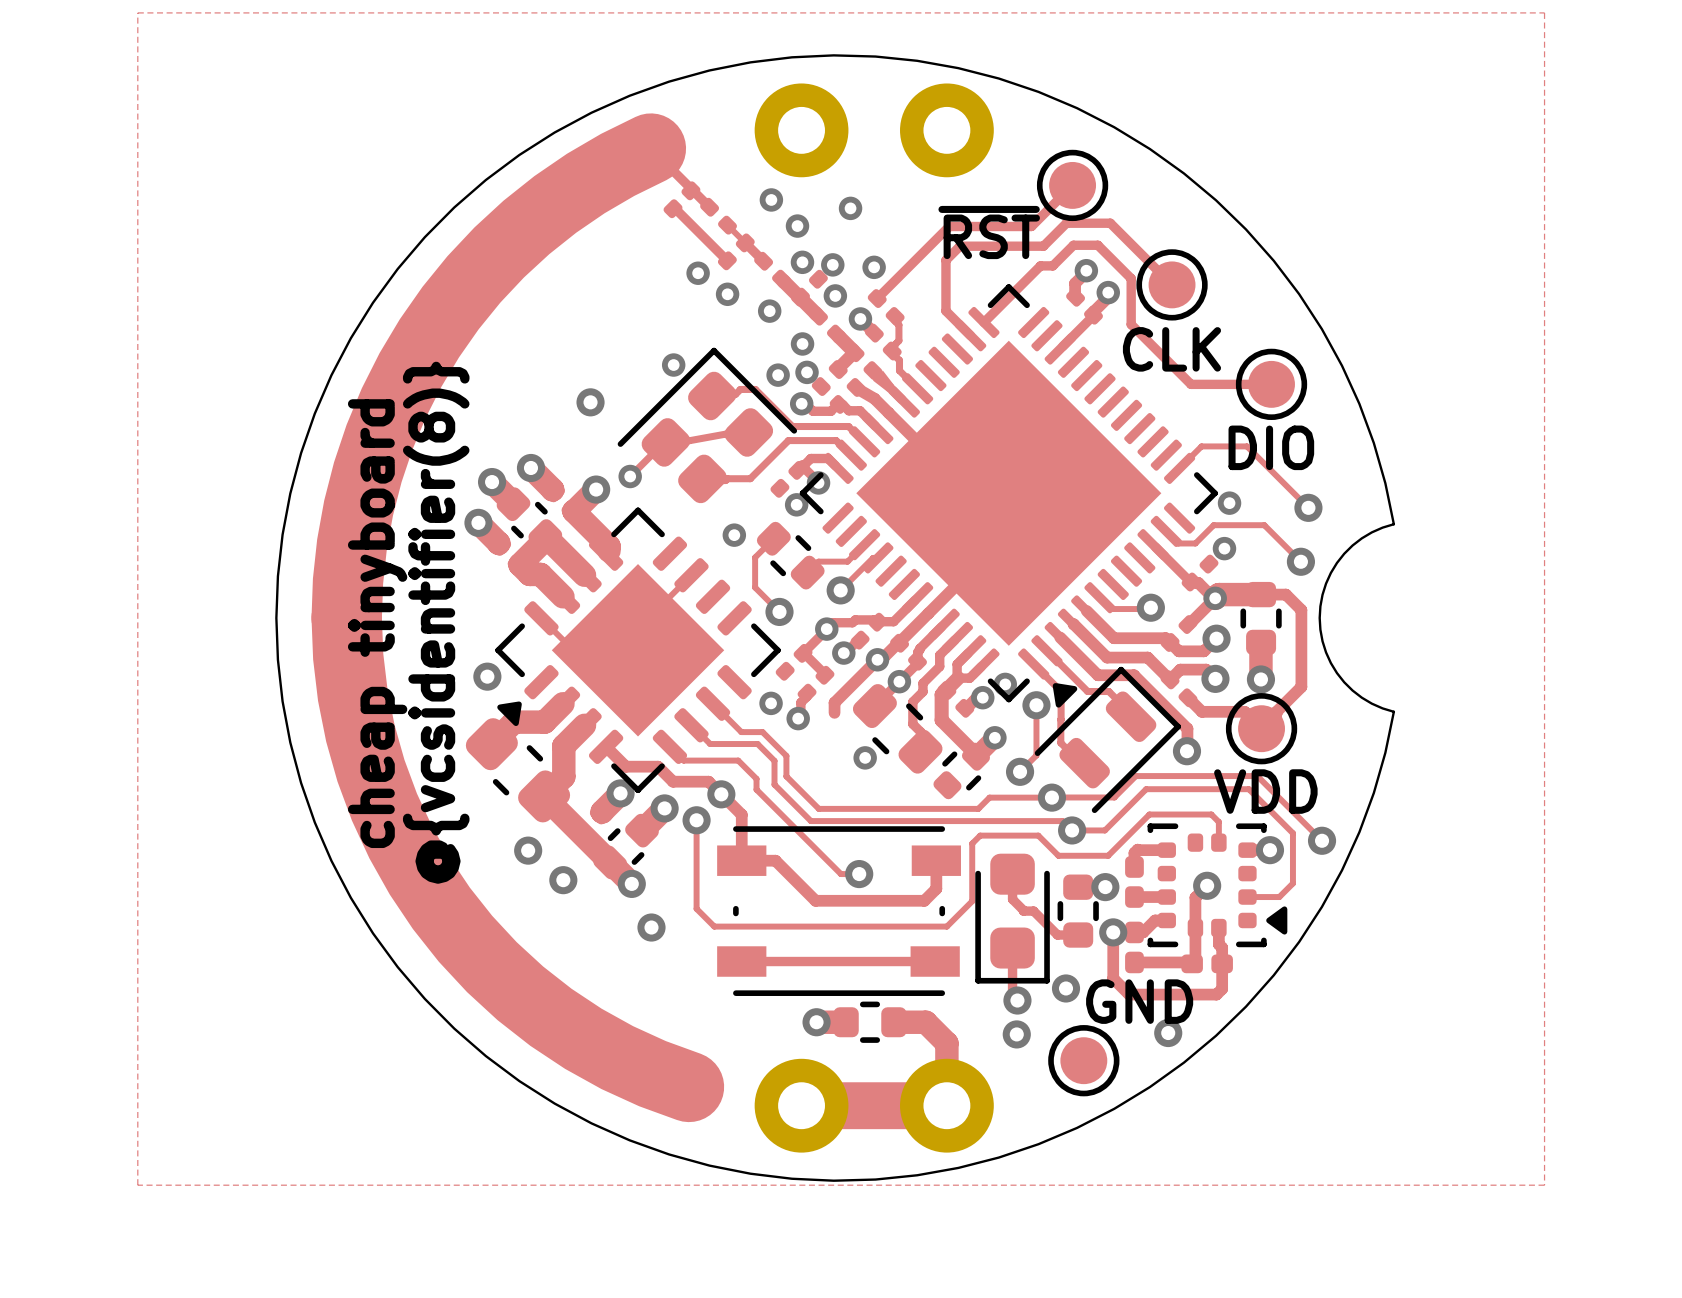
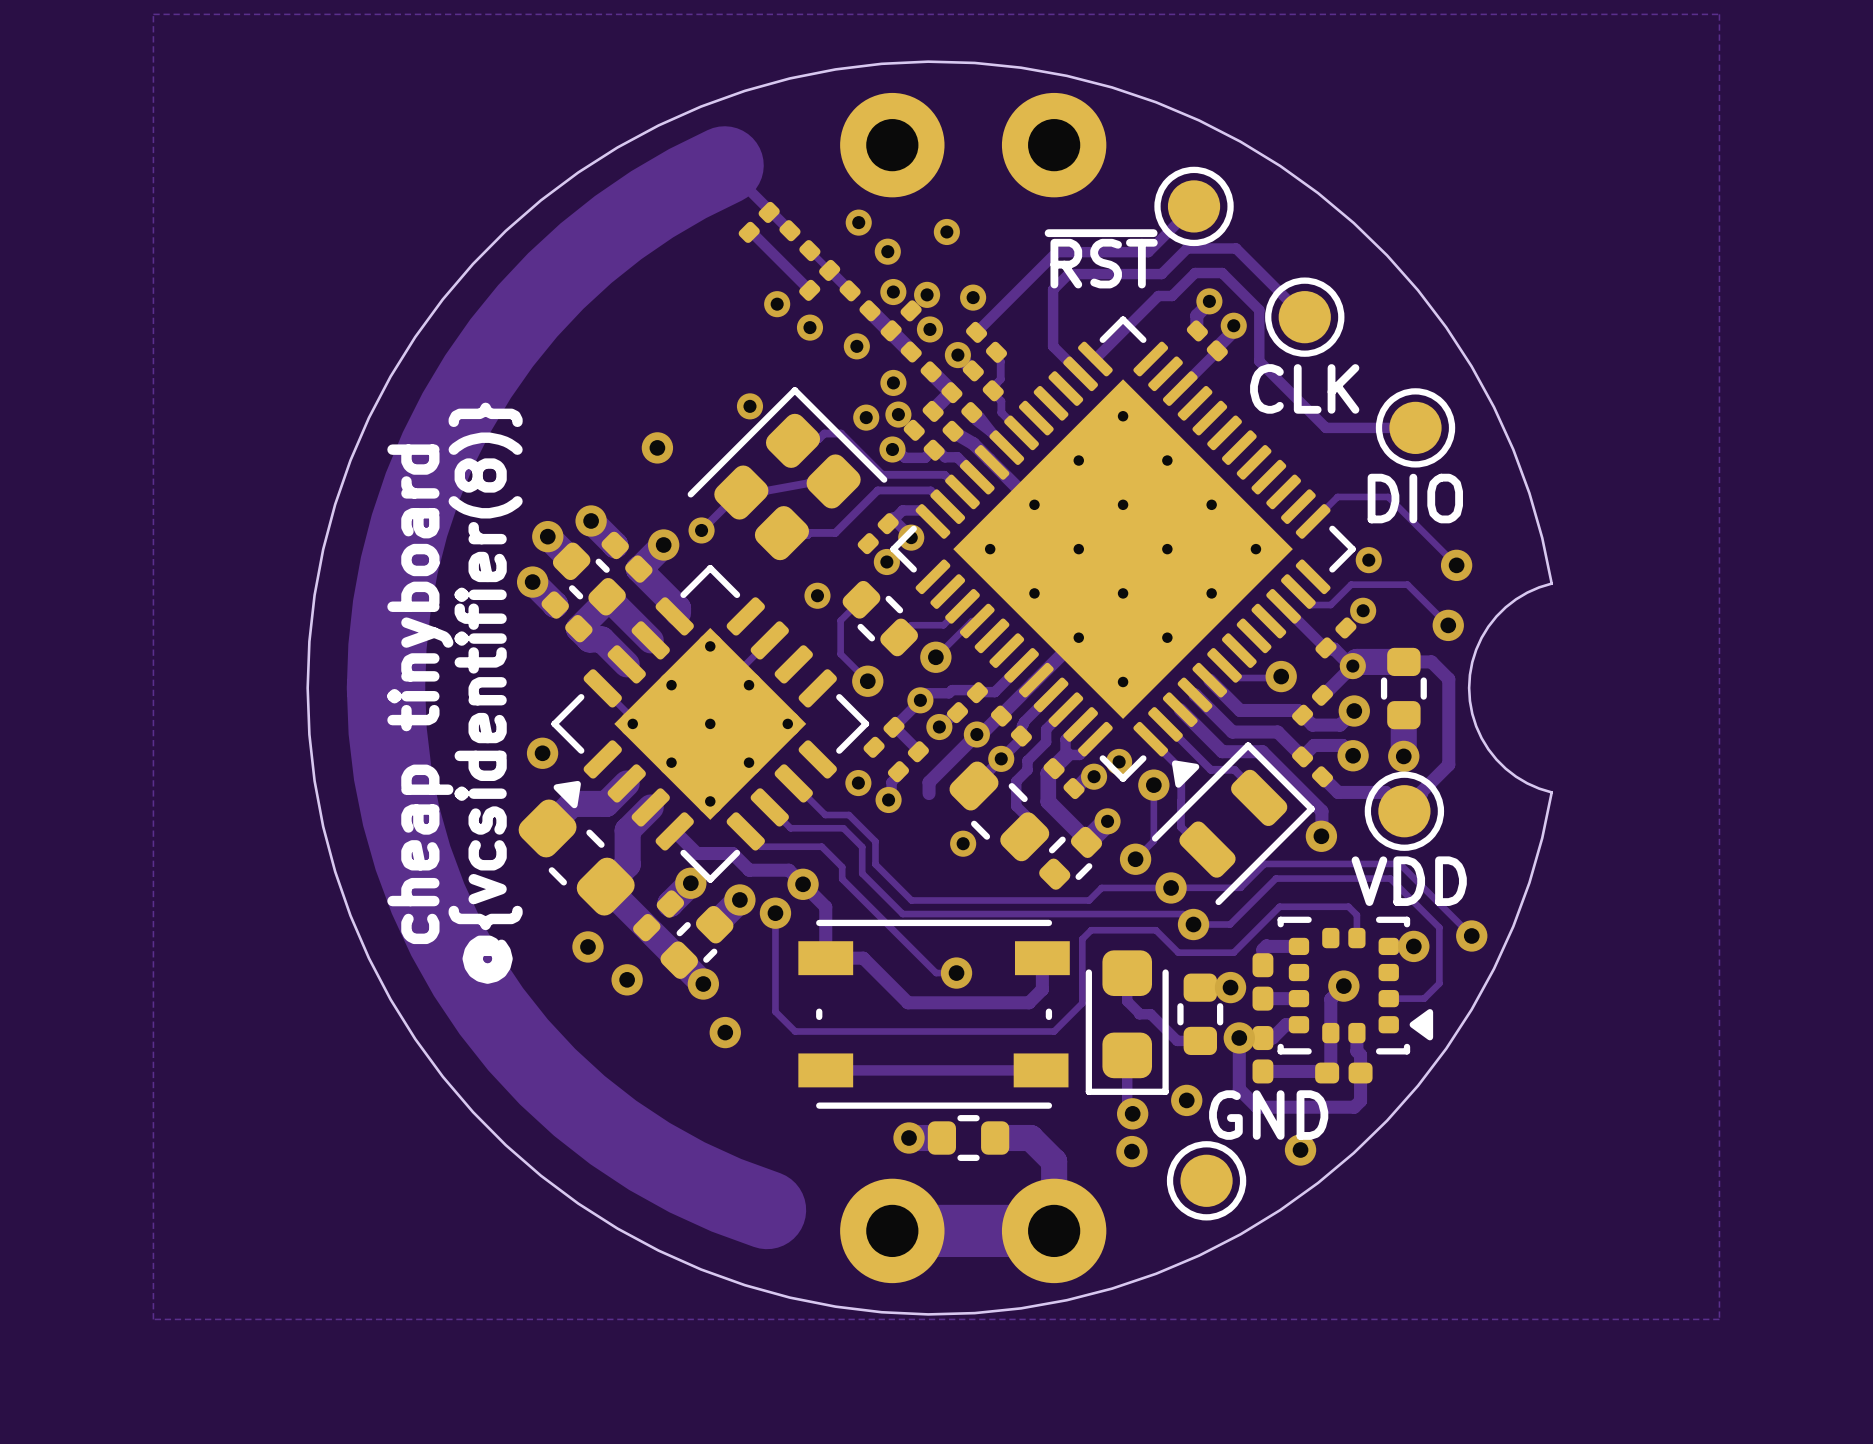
part footprint: [799, 284, 1218, 708] -> [890, 316, 1356, 788]
part footprint: [495, 507, 781, 794] -> [551, 565, 870, 883]

